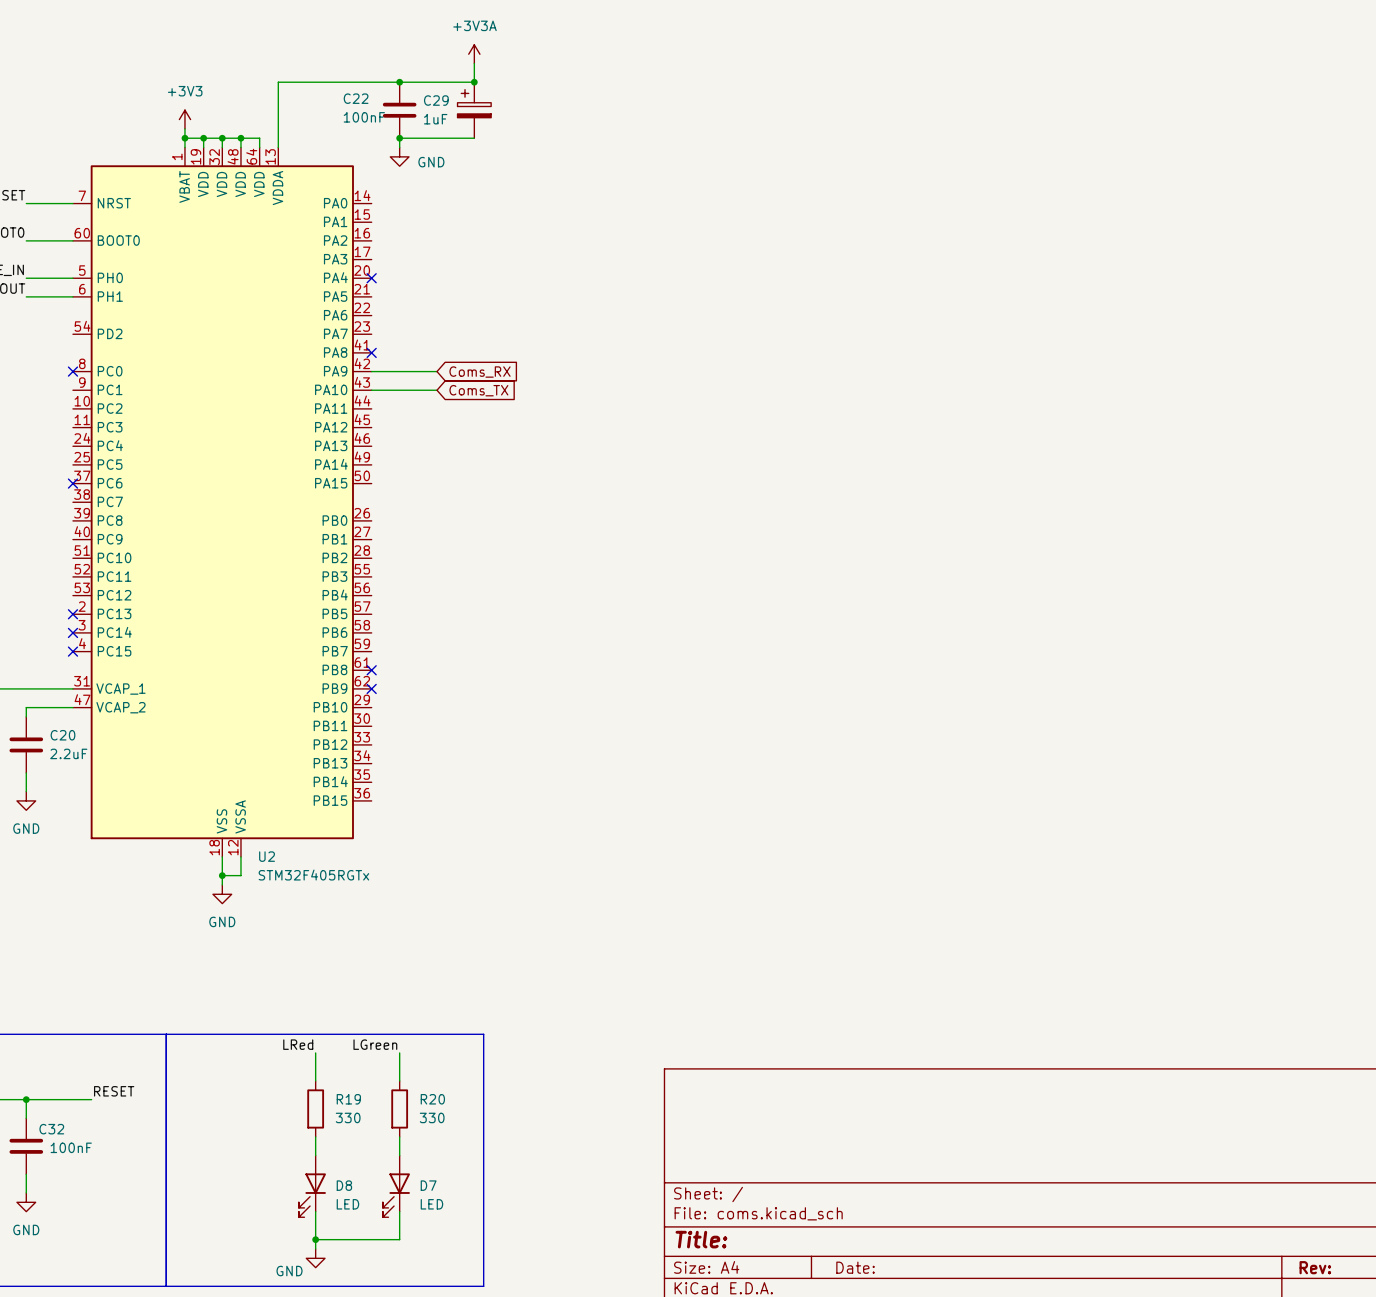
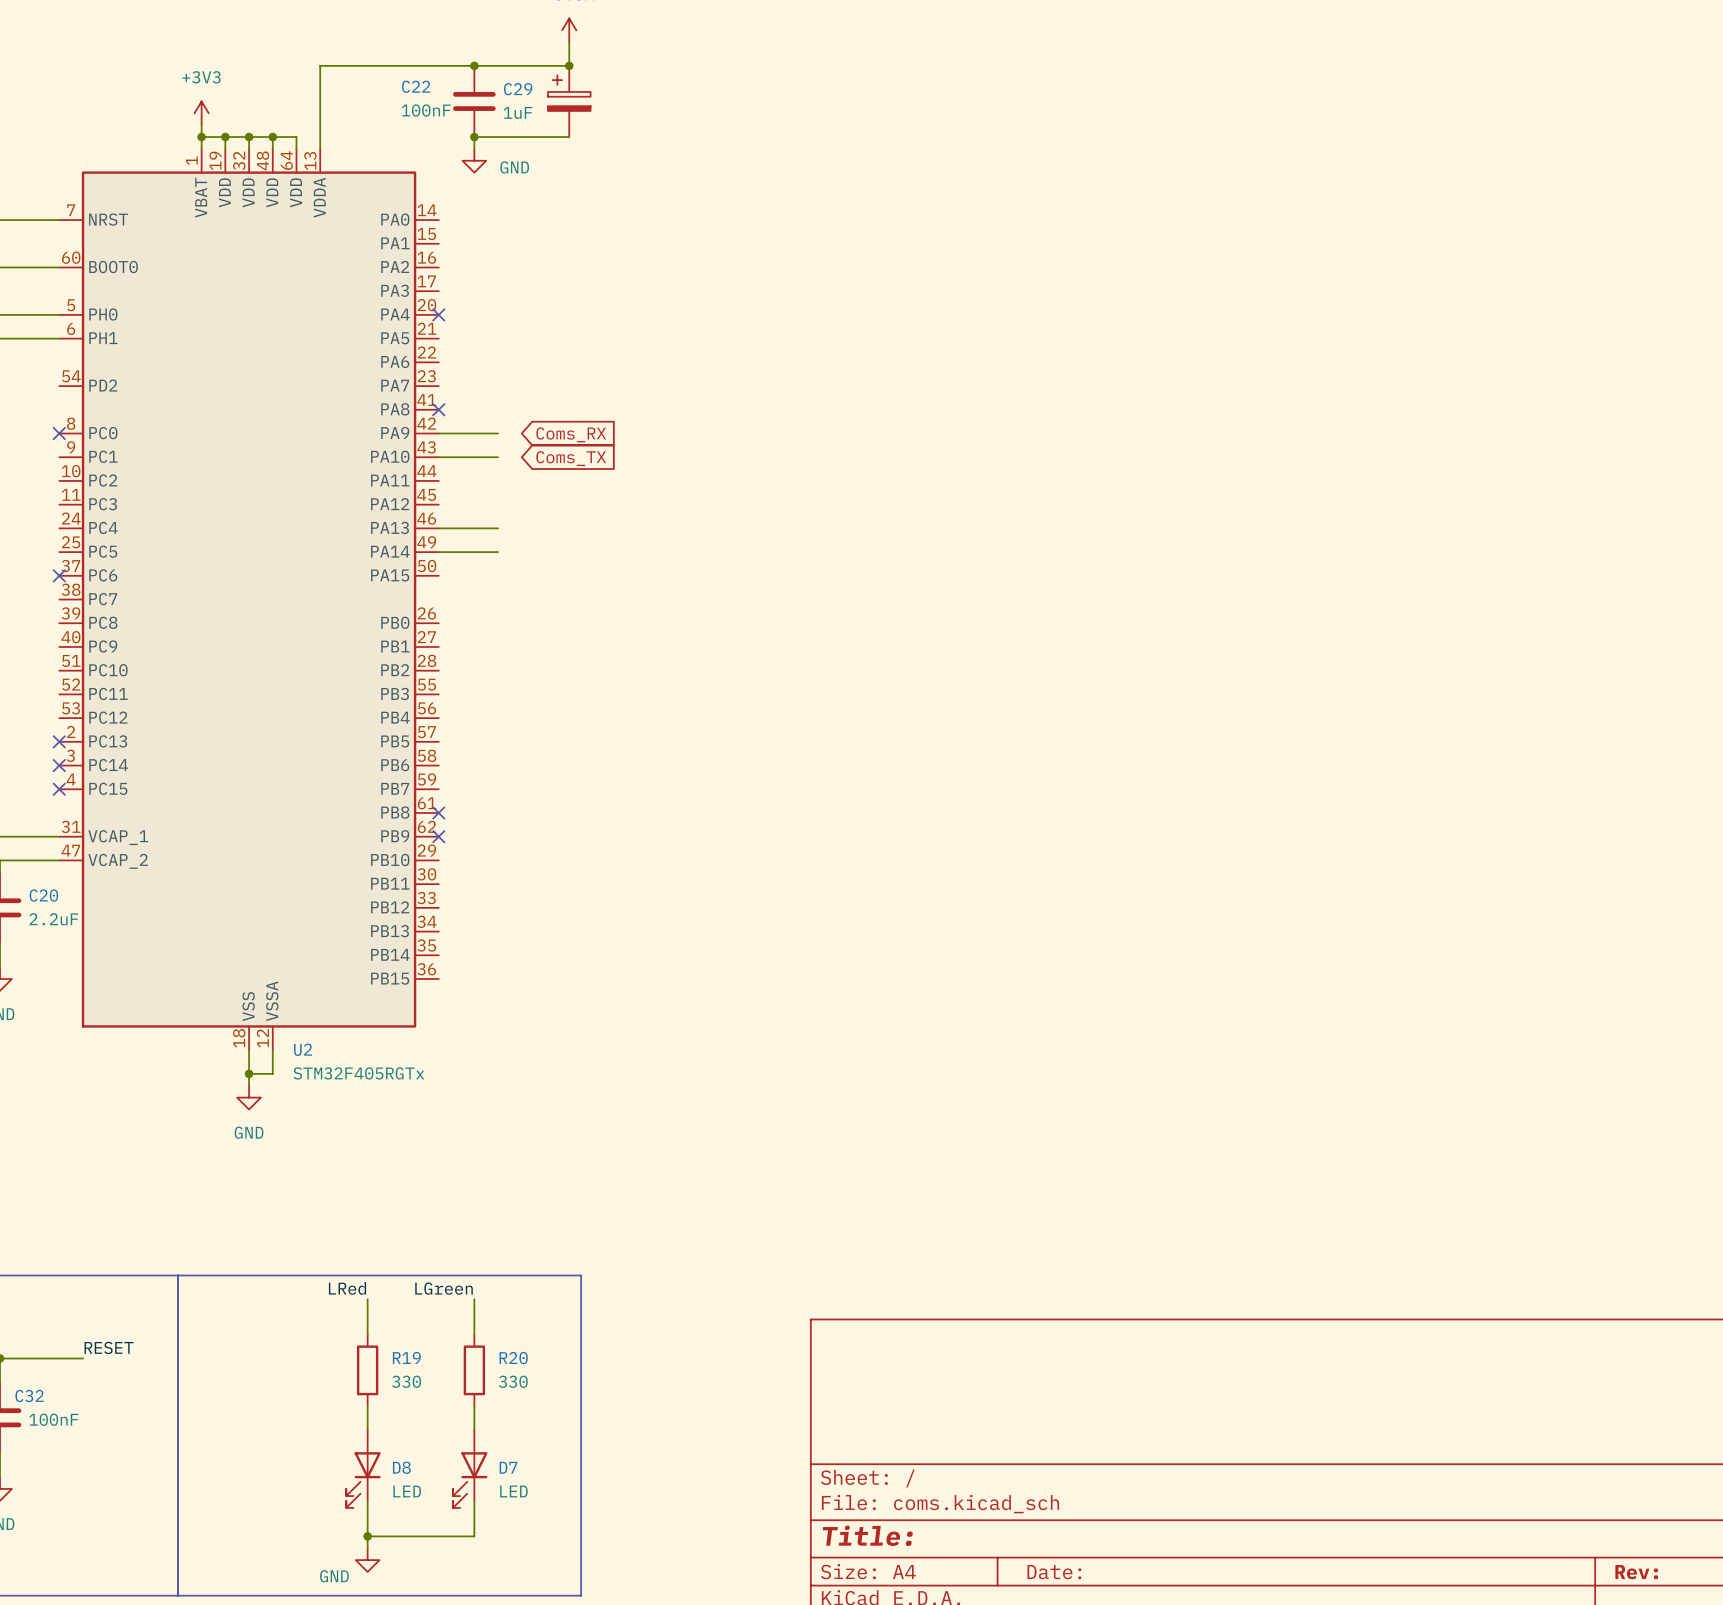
wire: (418, 371) (437, 371) -> none
wire: (418, 390) (437, 390) -> none
wire: none -> (438, 528) (498, 528)
wire: none -> (438, 552) (498, 552)

